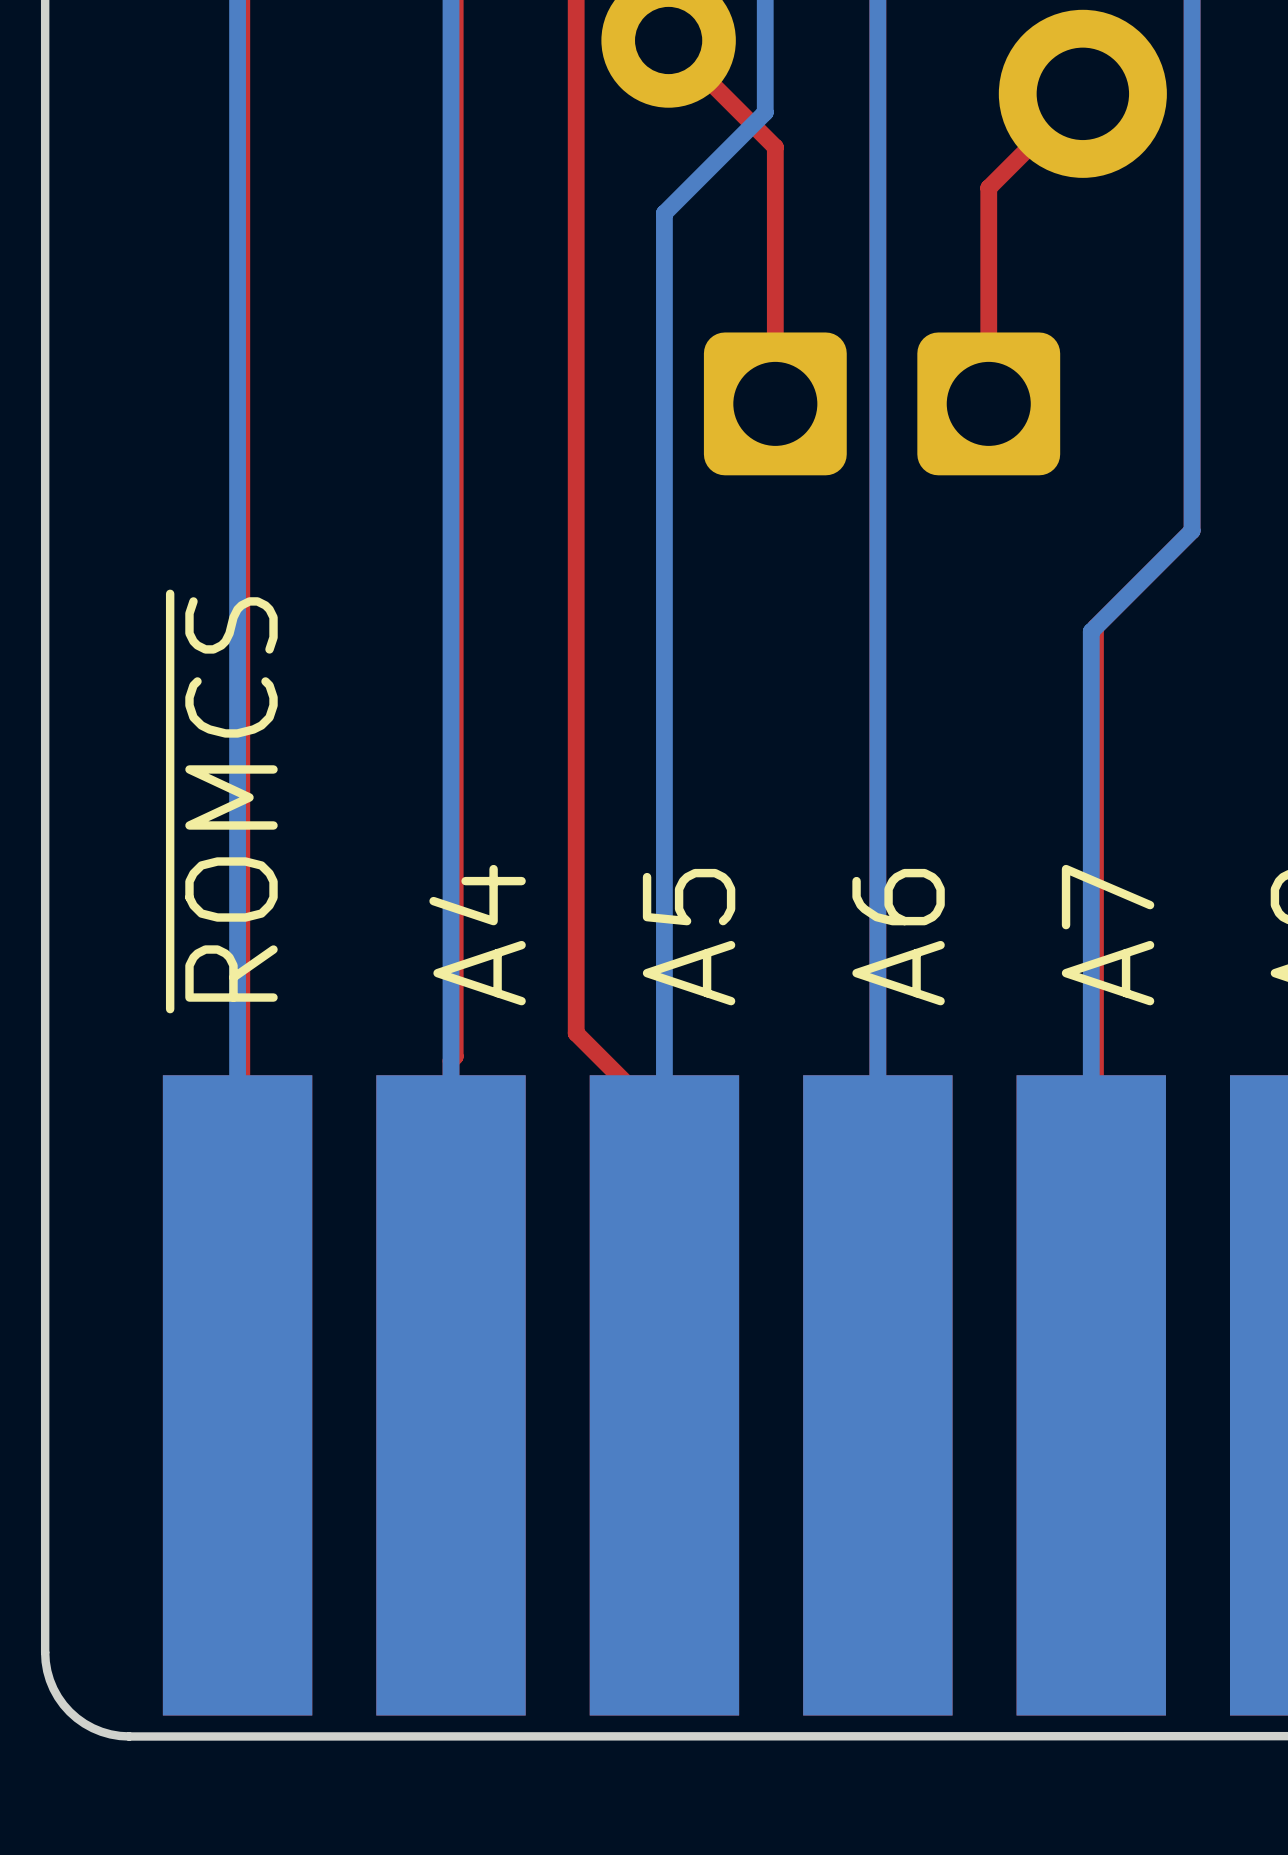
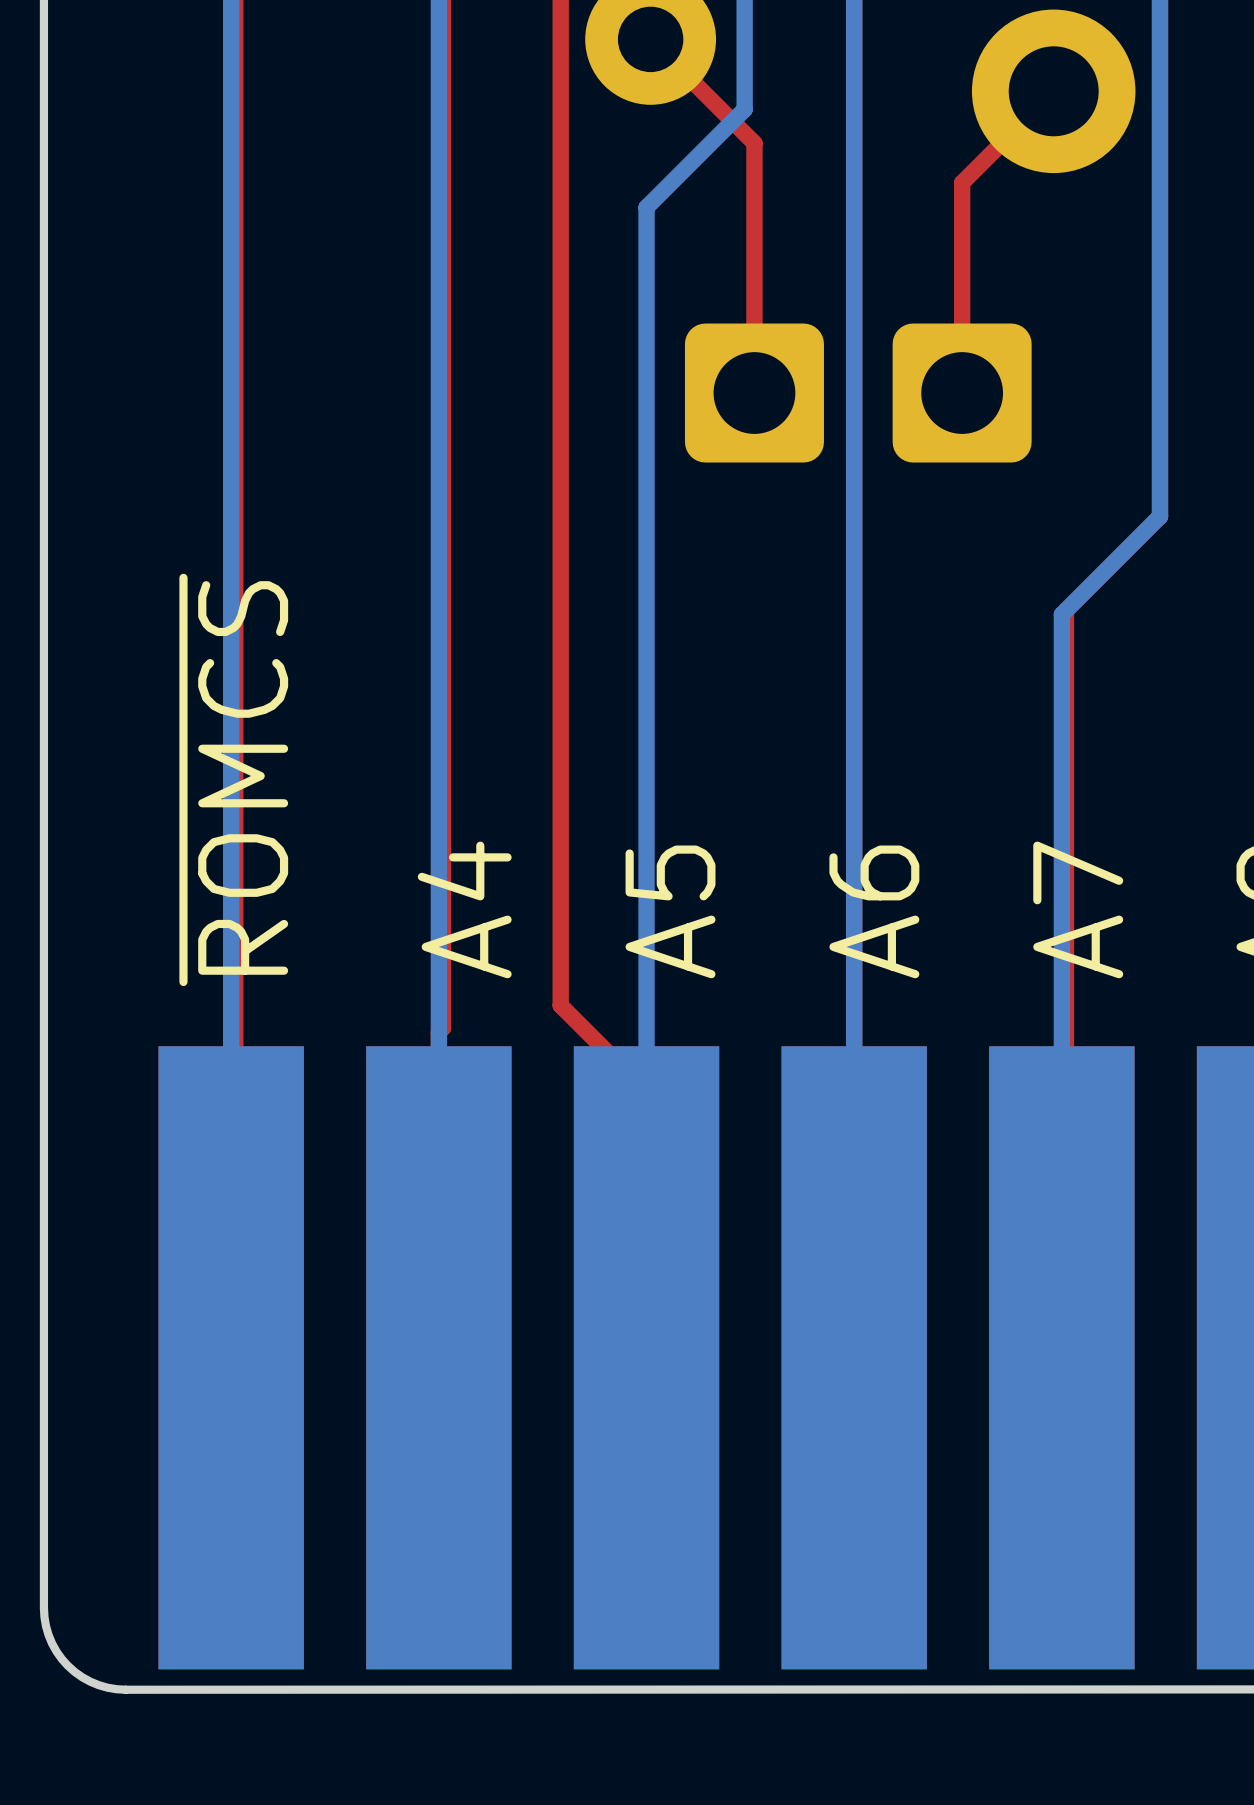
text position: ~{ROMCS} (221, 801) -> ~{ROMCS} (233, 779)

